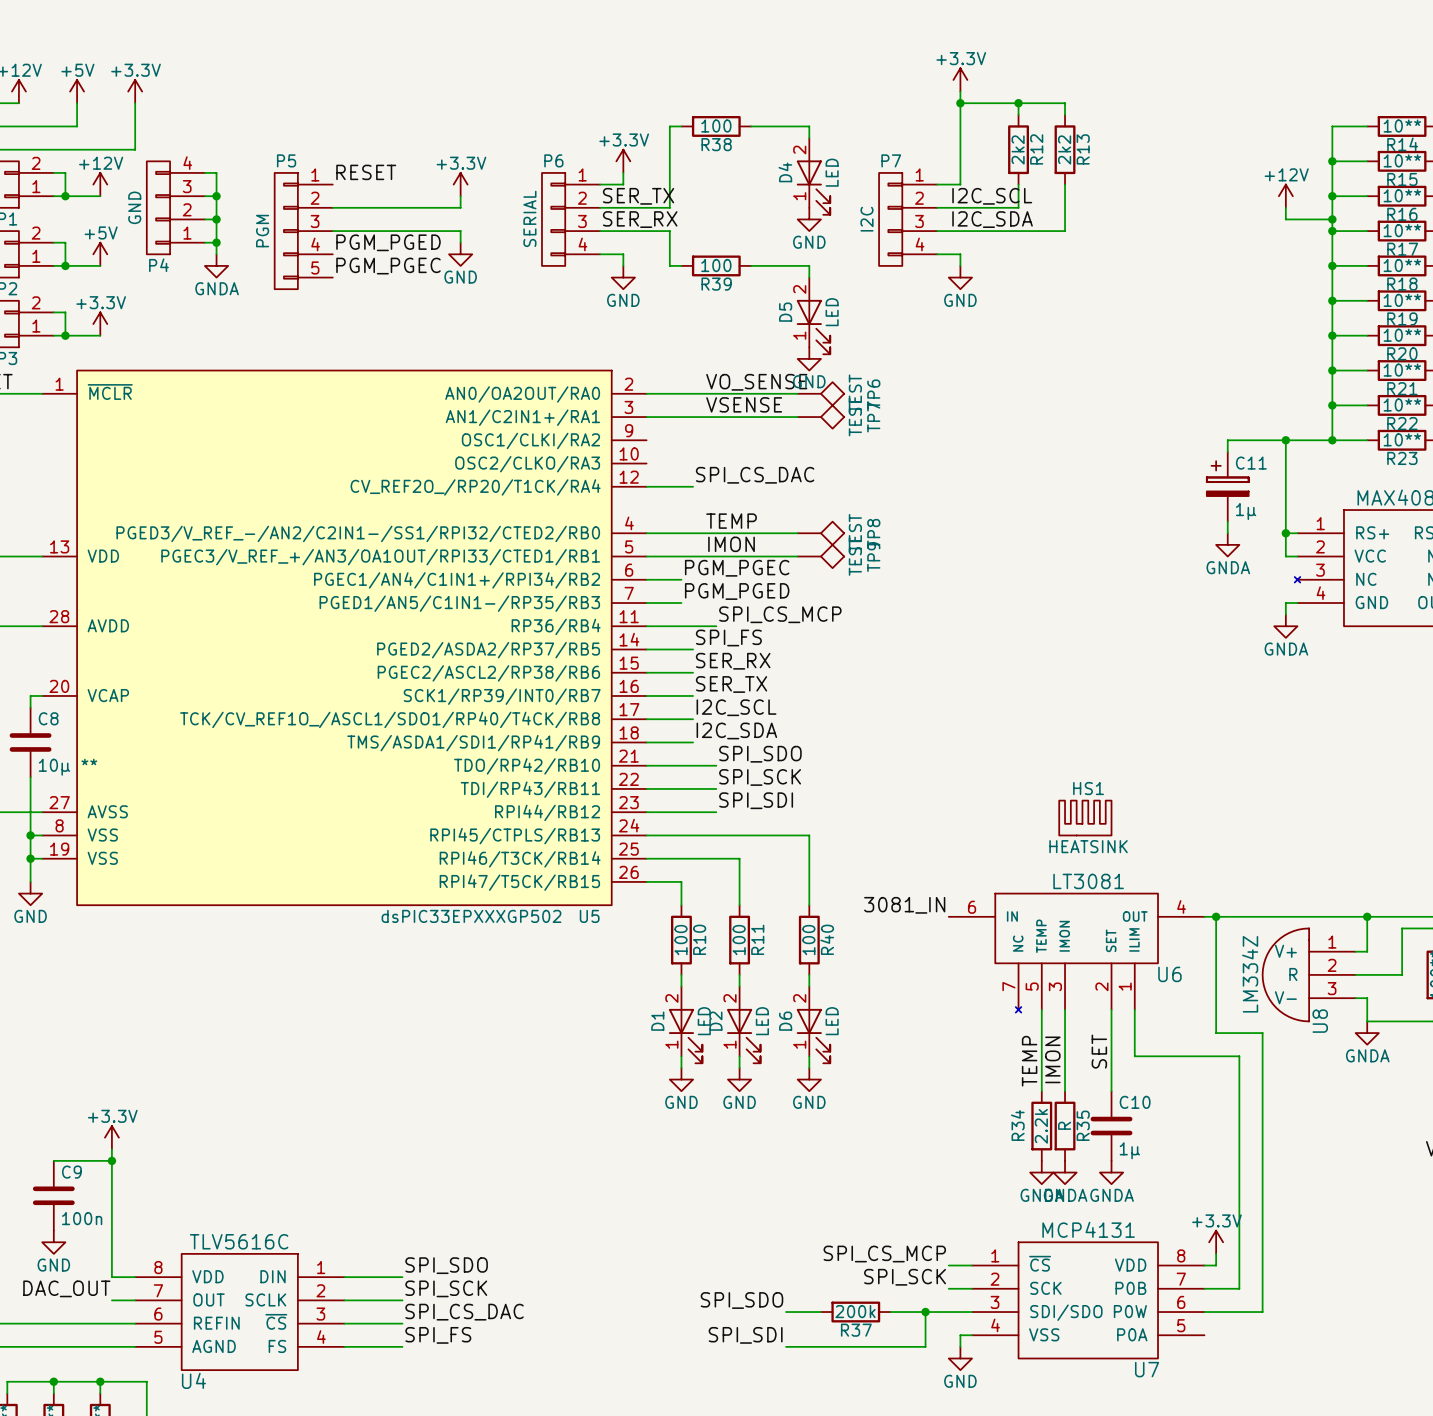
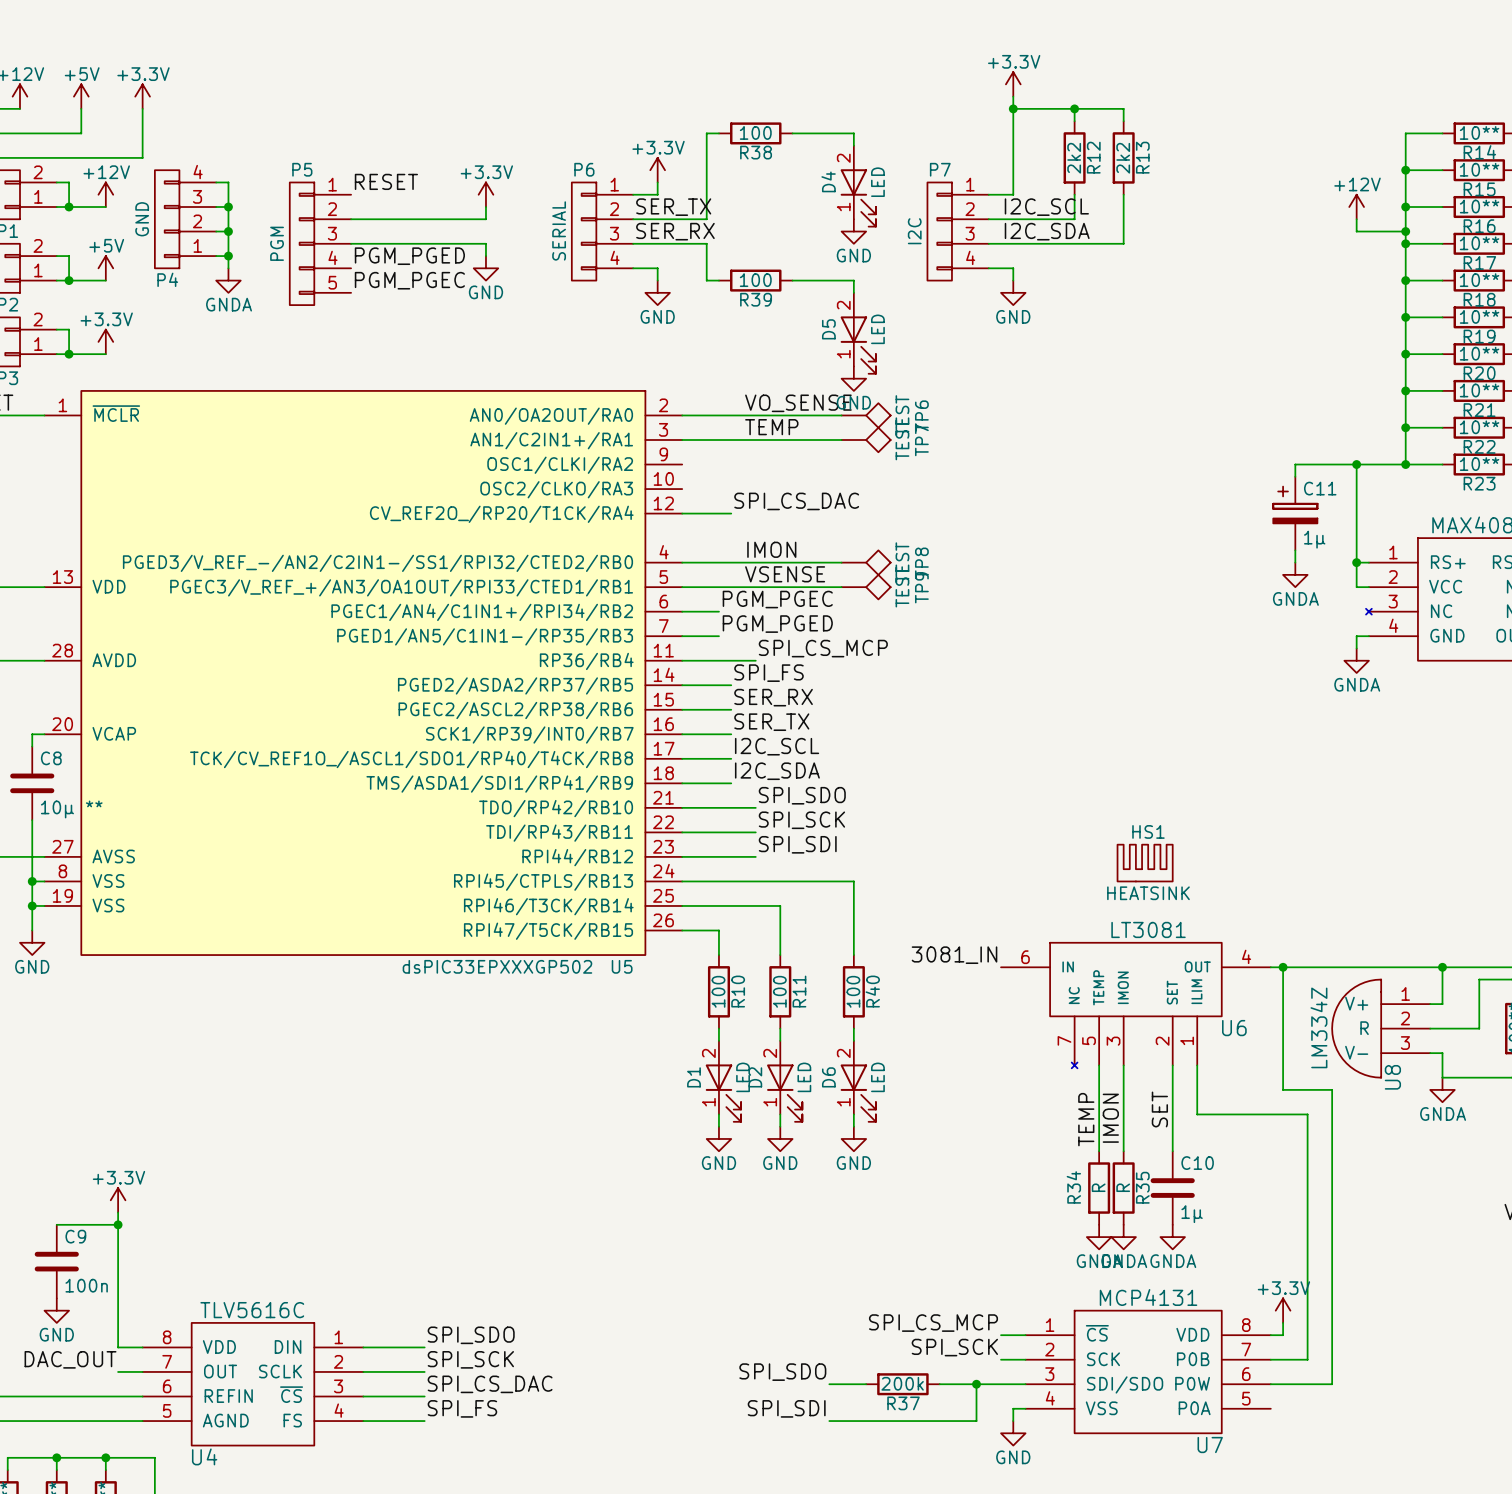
label: VSENSE (744, 404) -> TEMP (771, 427)
label: TEMP (731, 521) -> IMON (771, 549)
label: IMON (731, 544) -> VSENSE (785, 574)
R34 value: 2.2k (1041, 1126) -> R (1098, 1187)

